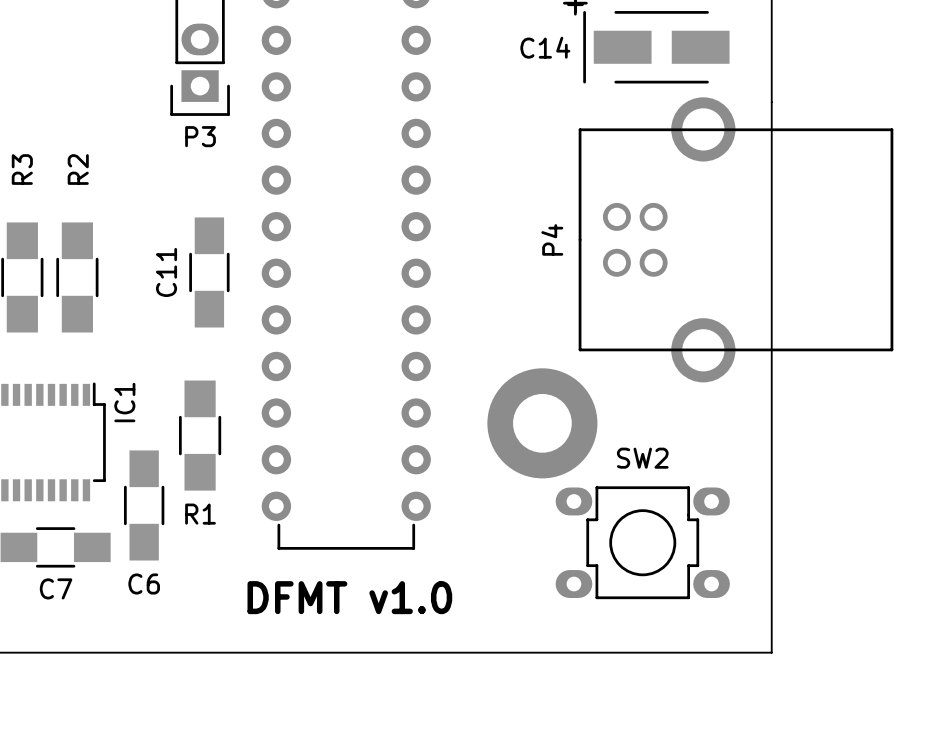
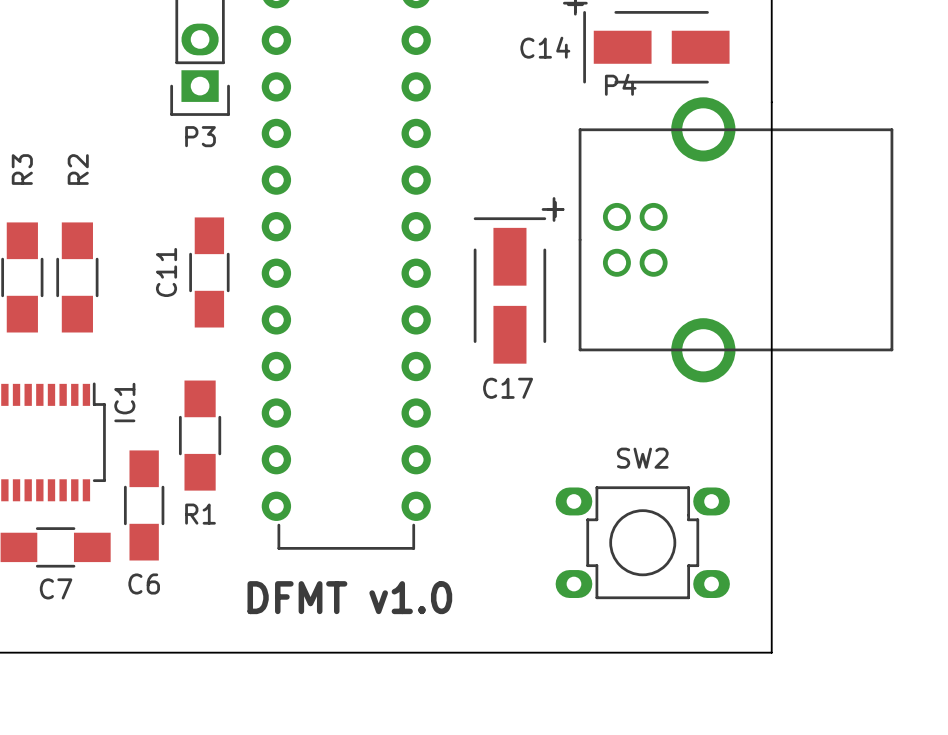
P4 name rotation: 0° (552, 239) -> 90° clockwise (620, 84)
P4 name position: P4 (552, 239) -> P4 (620, 84)
C17: none -> (519, 280)
part: (542, 423) -> none

